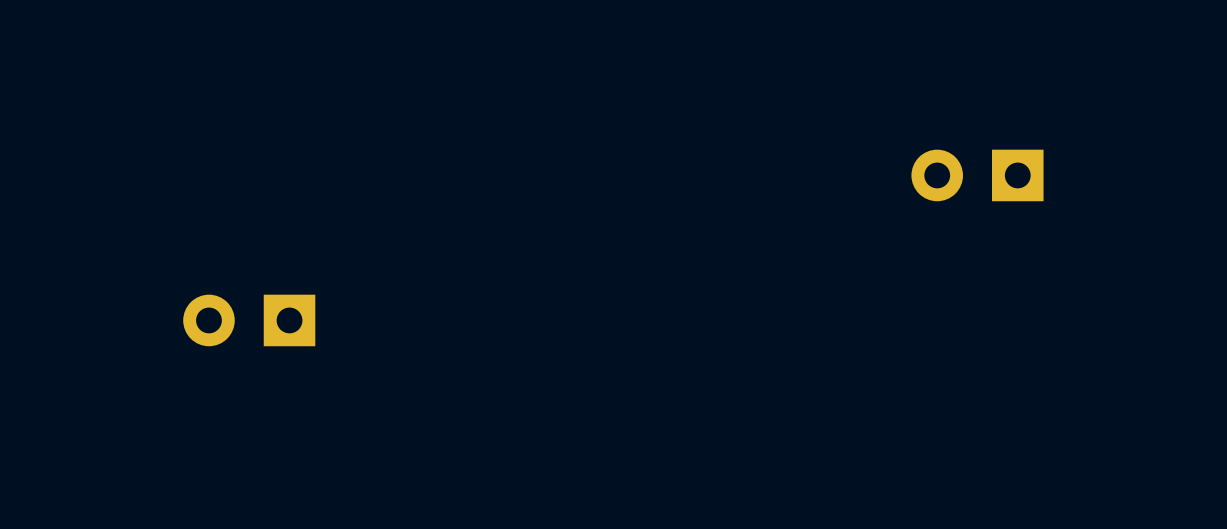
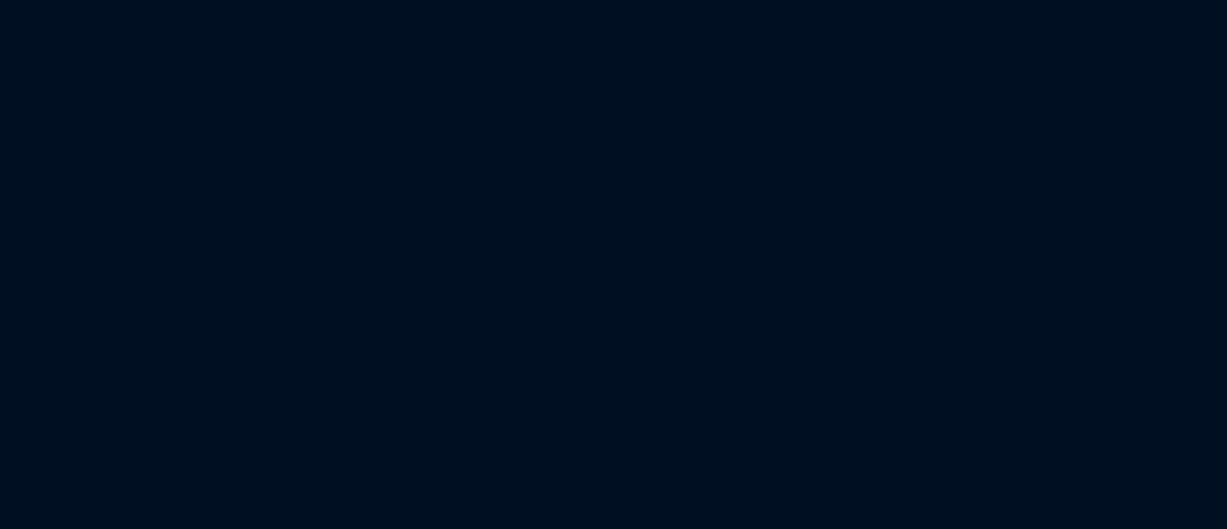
part: (977, 175) -> none
part: (249, 320) -> none

